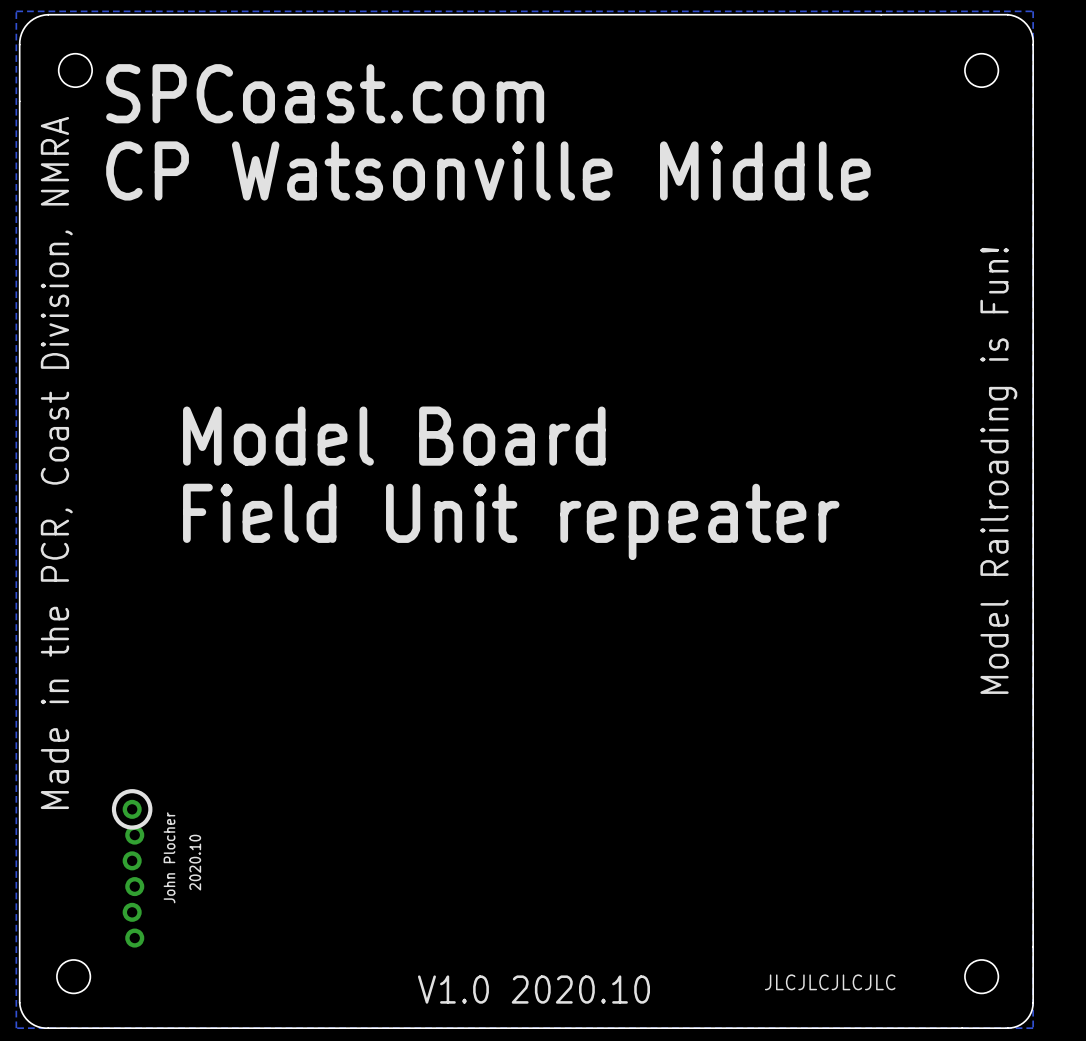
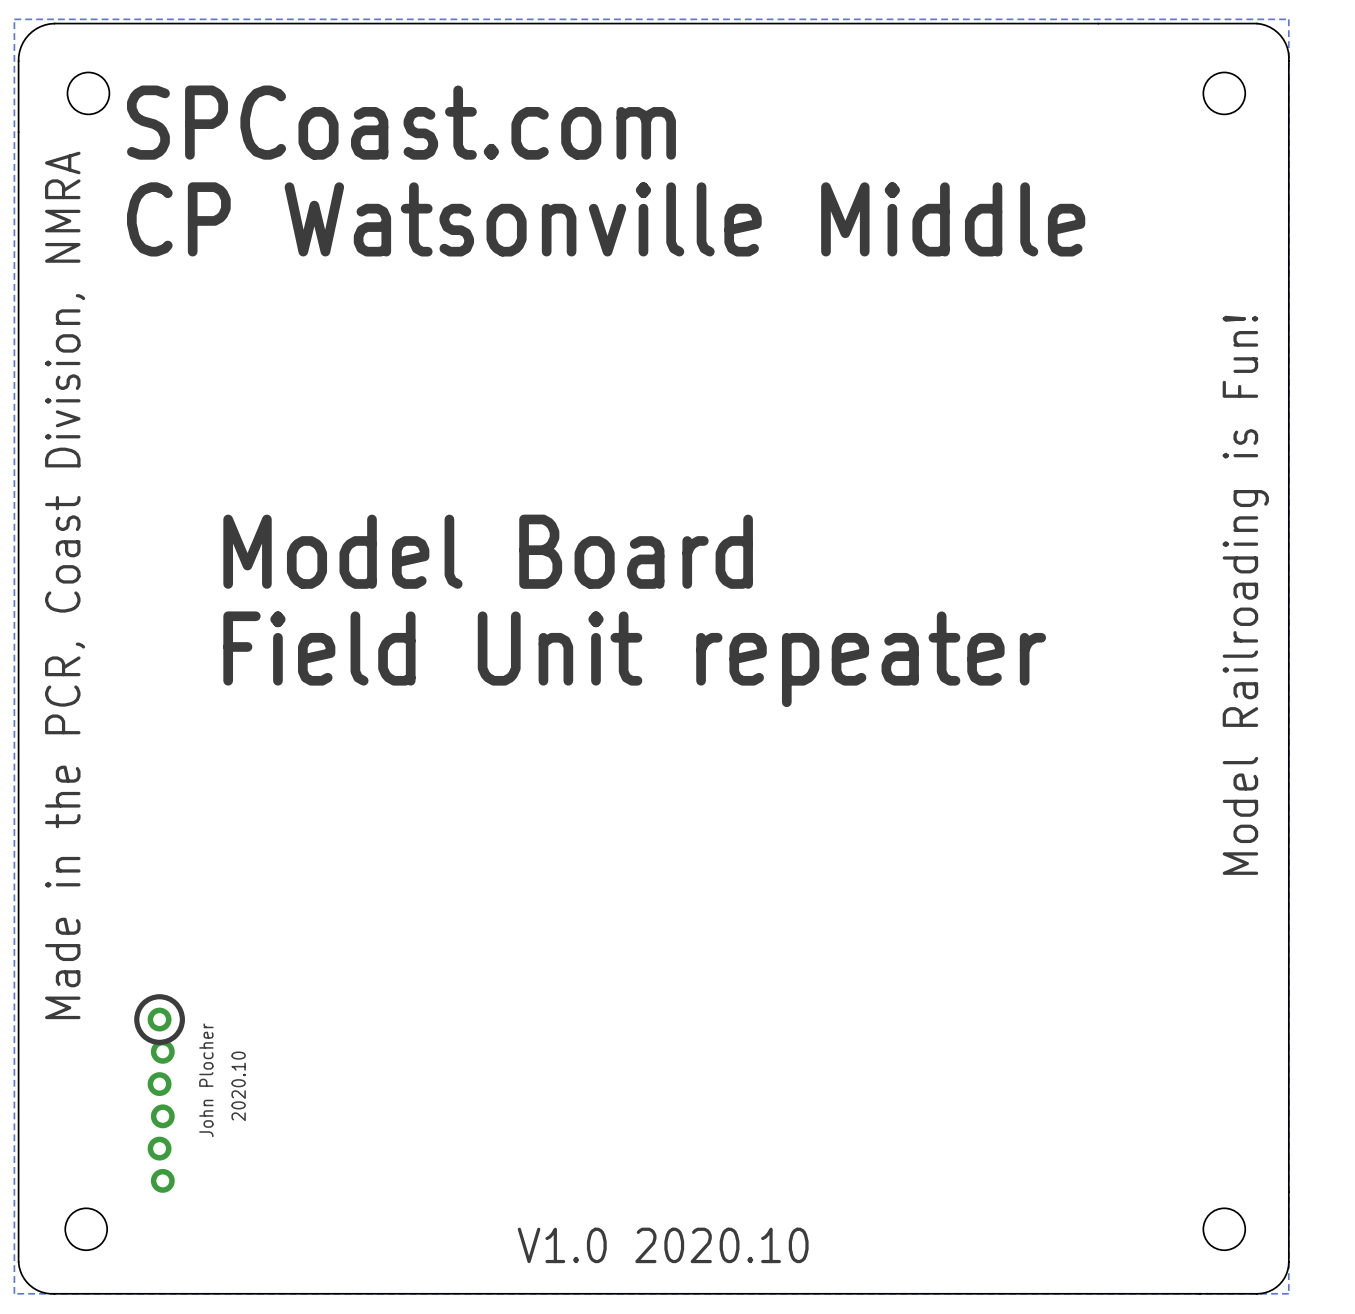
text: JLCJLCJLCJLC (830, 982) -> none

